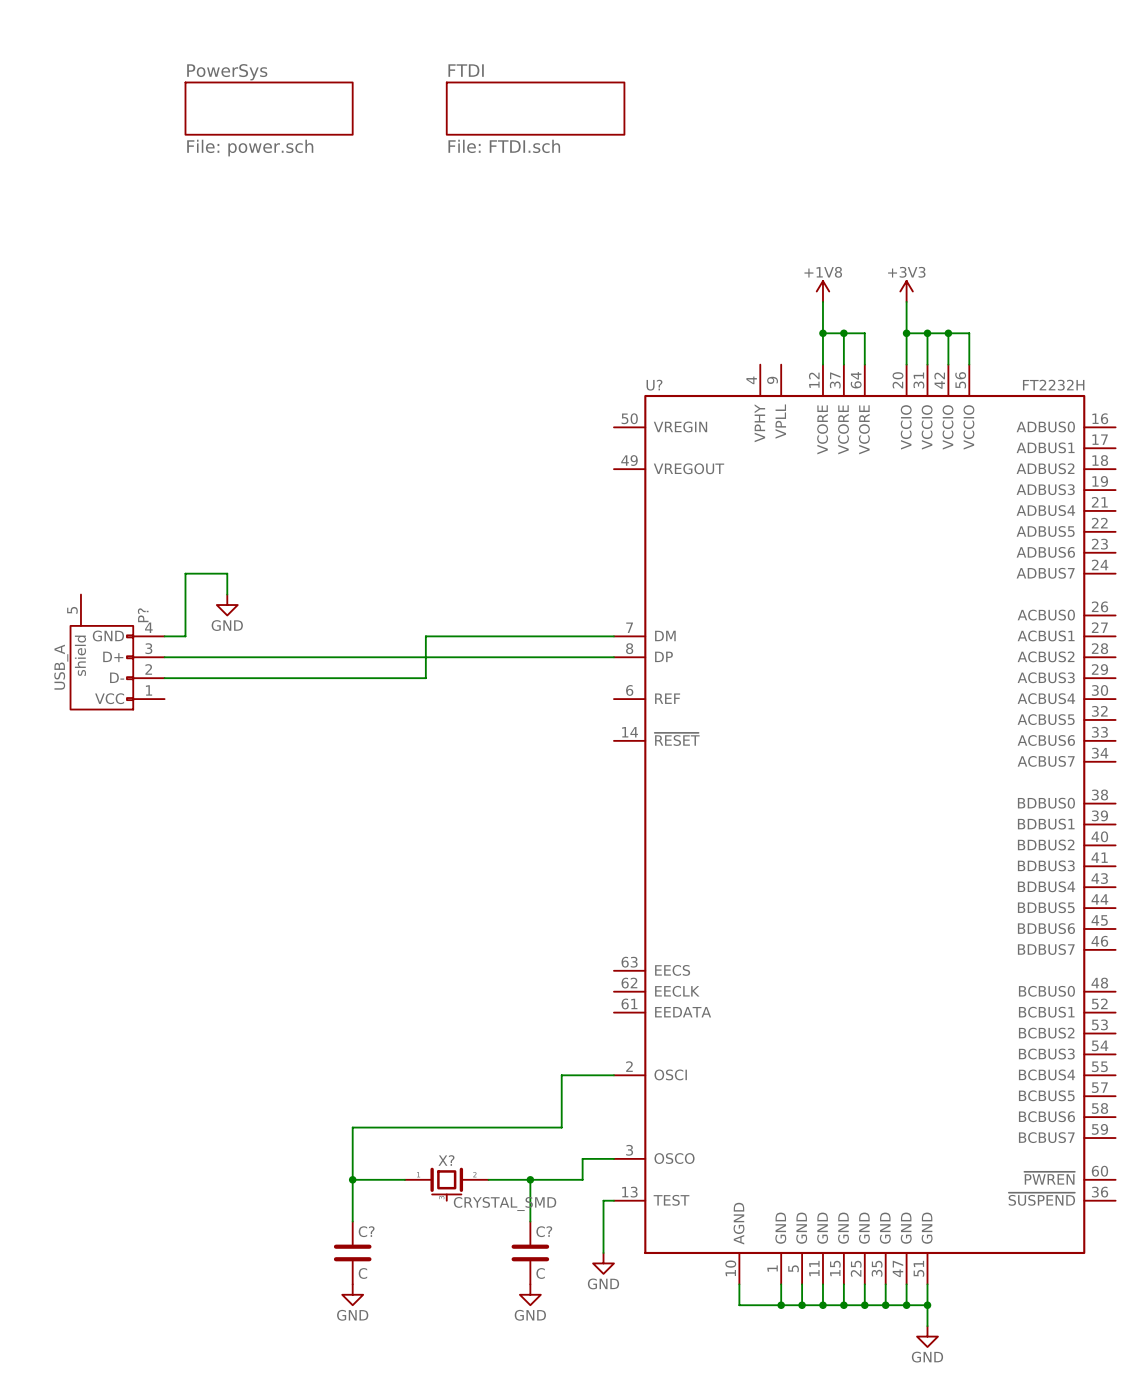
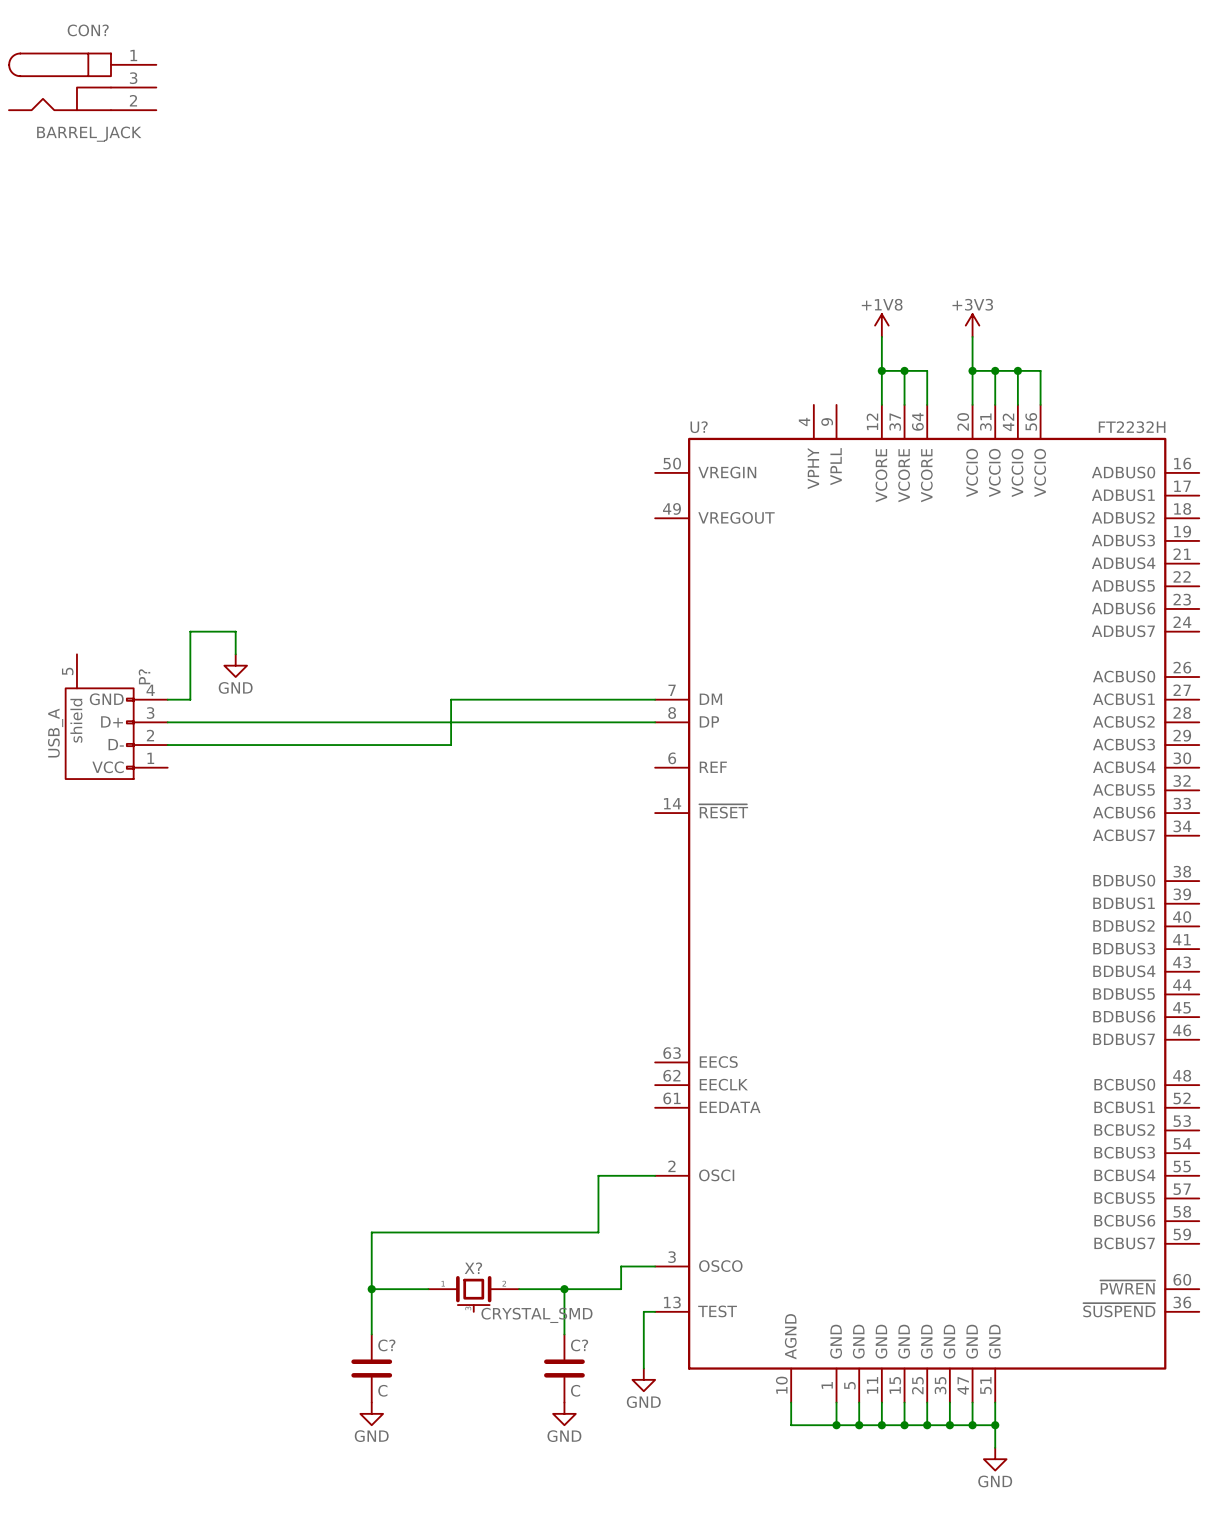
CON?: none -> BARREL_JACK (82, 81)
sheet PowerSys: File: power.sch (269, 108) -> none
sheet FTDI: File: FTDI.sch (535, 108) -> none

